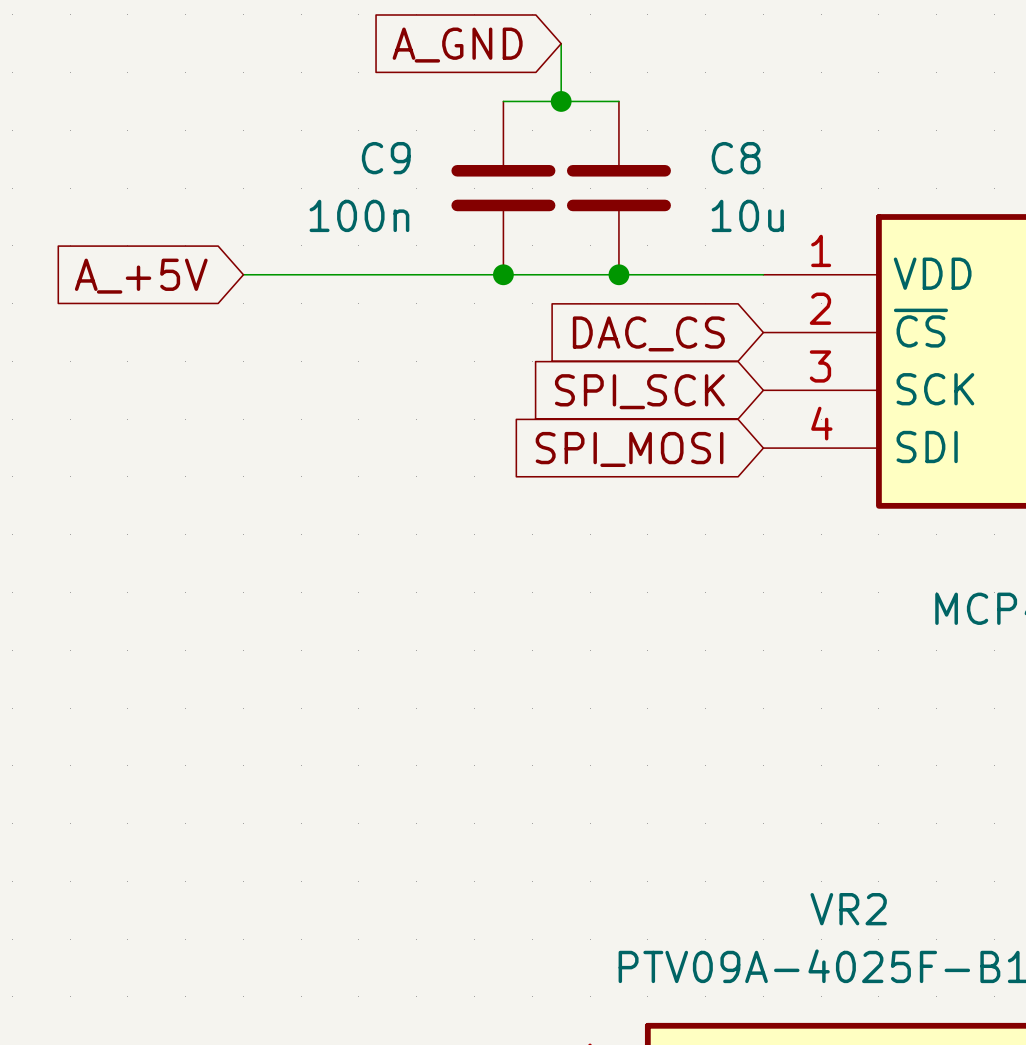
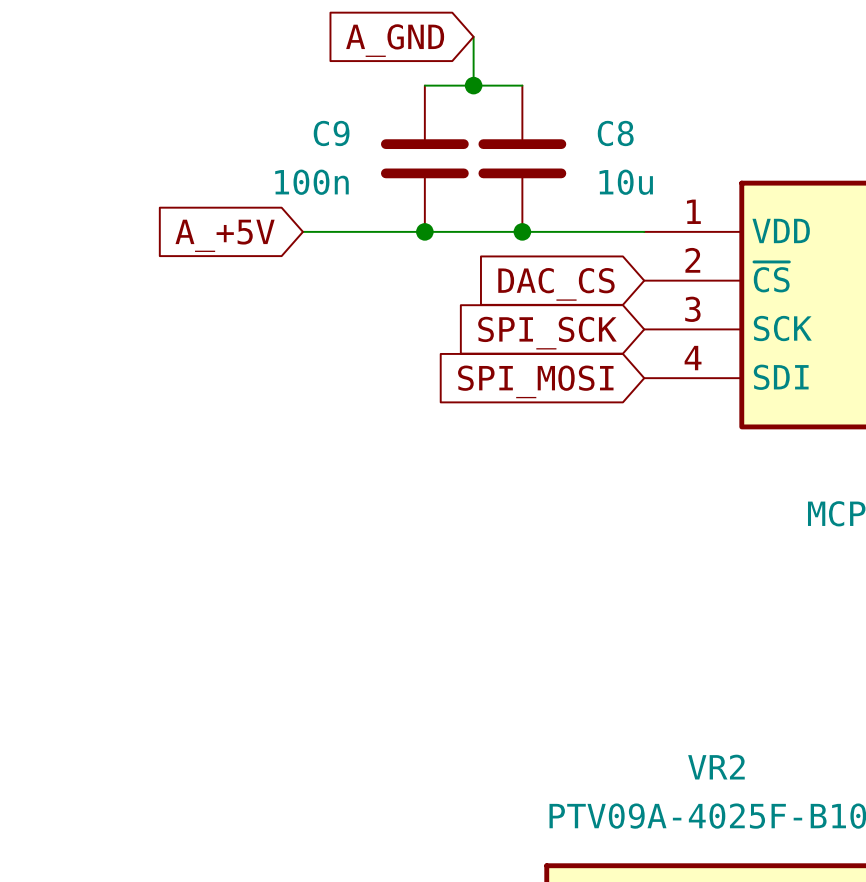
wire: (243, 274) (358, 274) -> none
global label position: A_+5V (141, 276) -> A_+5V (225, 235)

